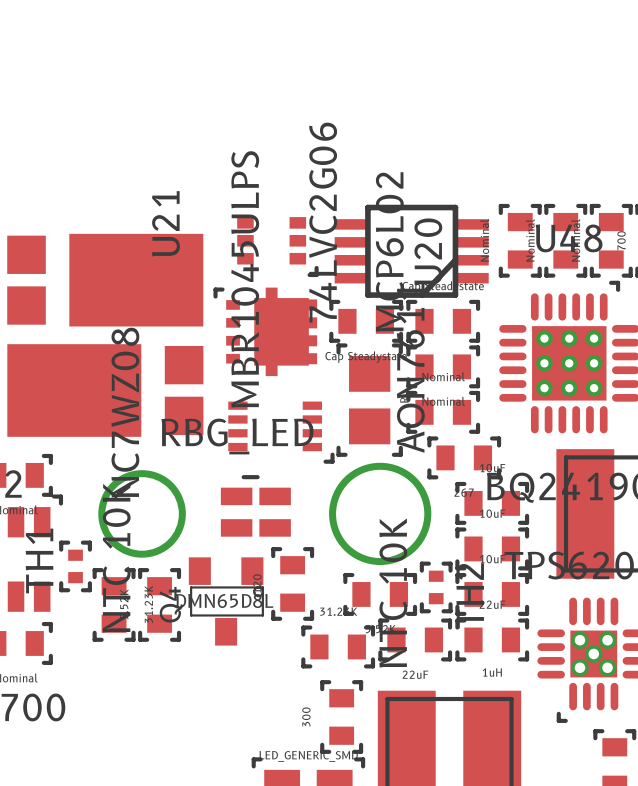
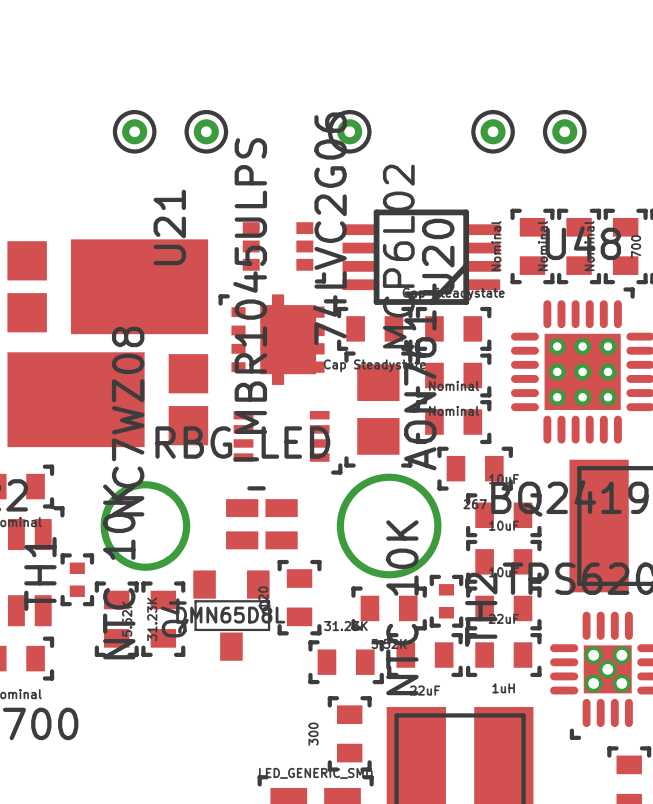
part: none -> (134, 131)
part: none -> (206, 131)
part: none -> (349, 131)
part: none -> (493, 131)
part: none -> (564, 131)

